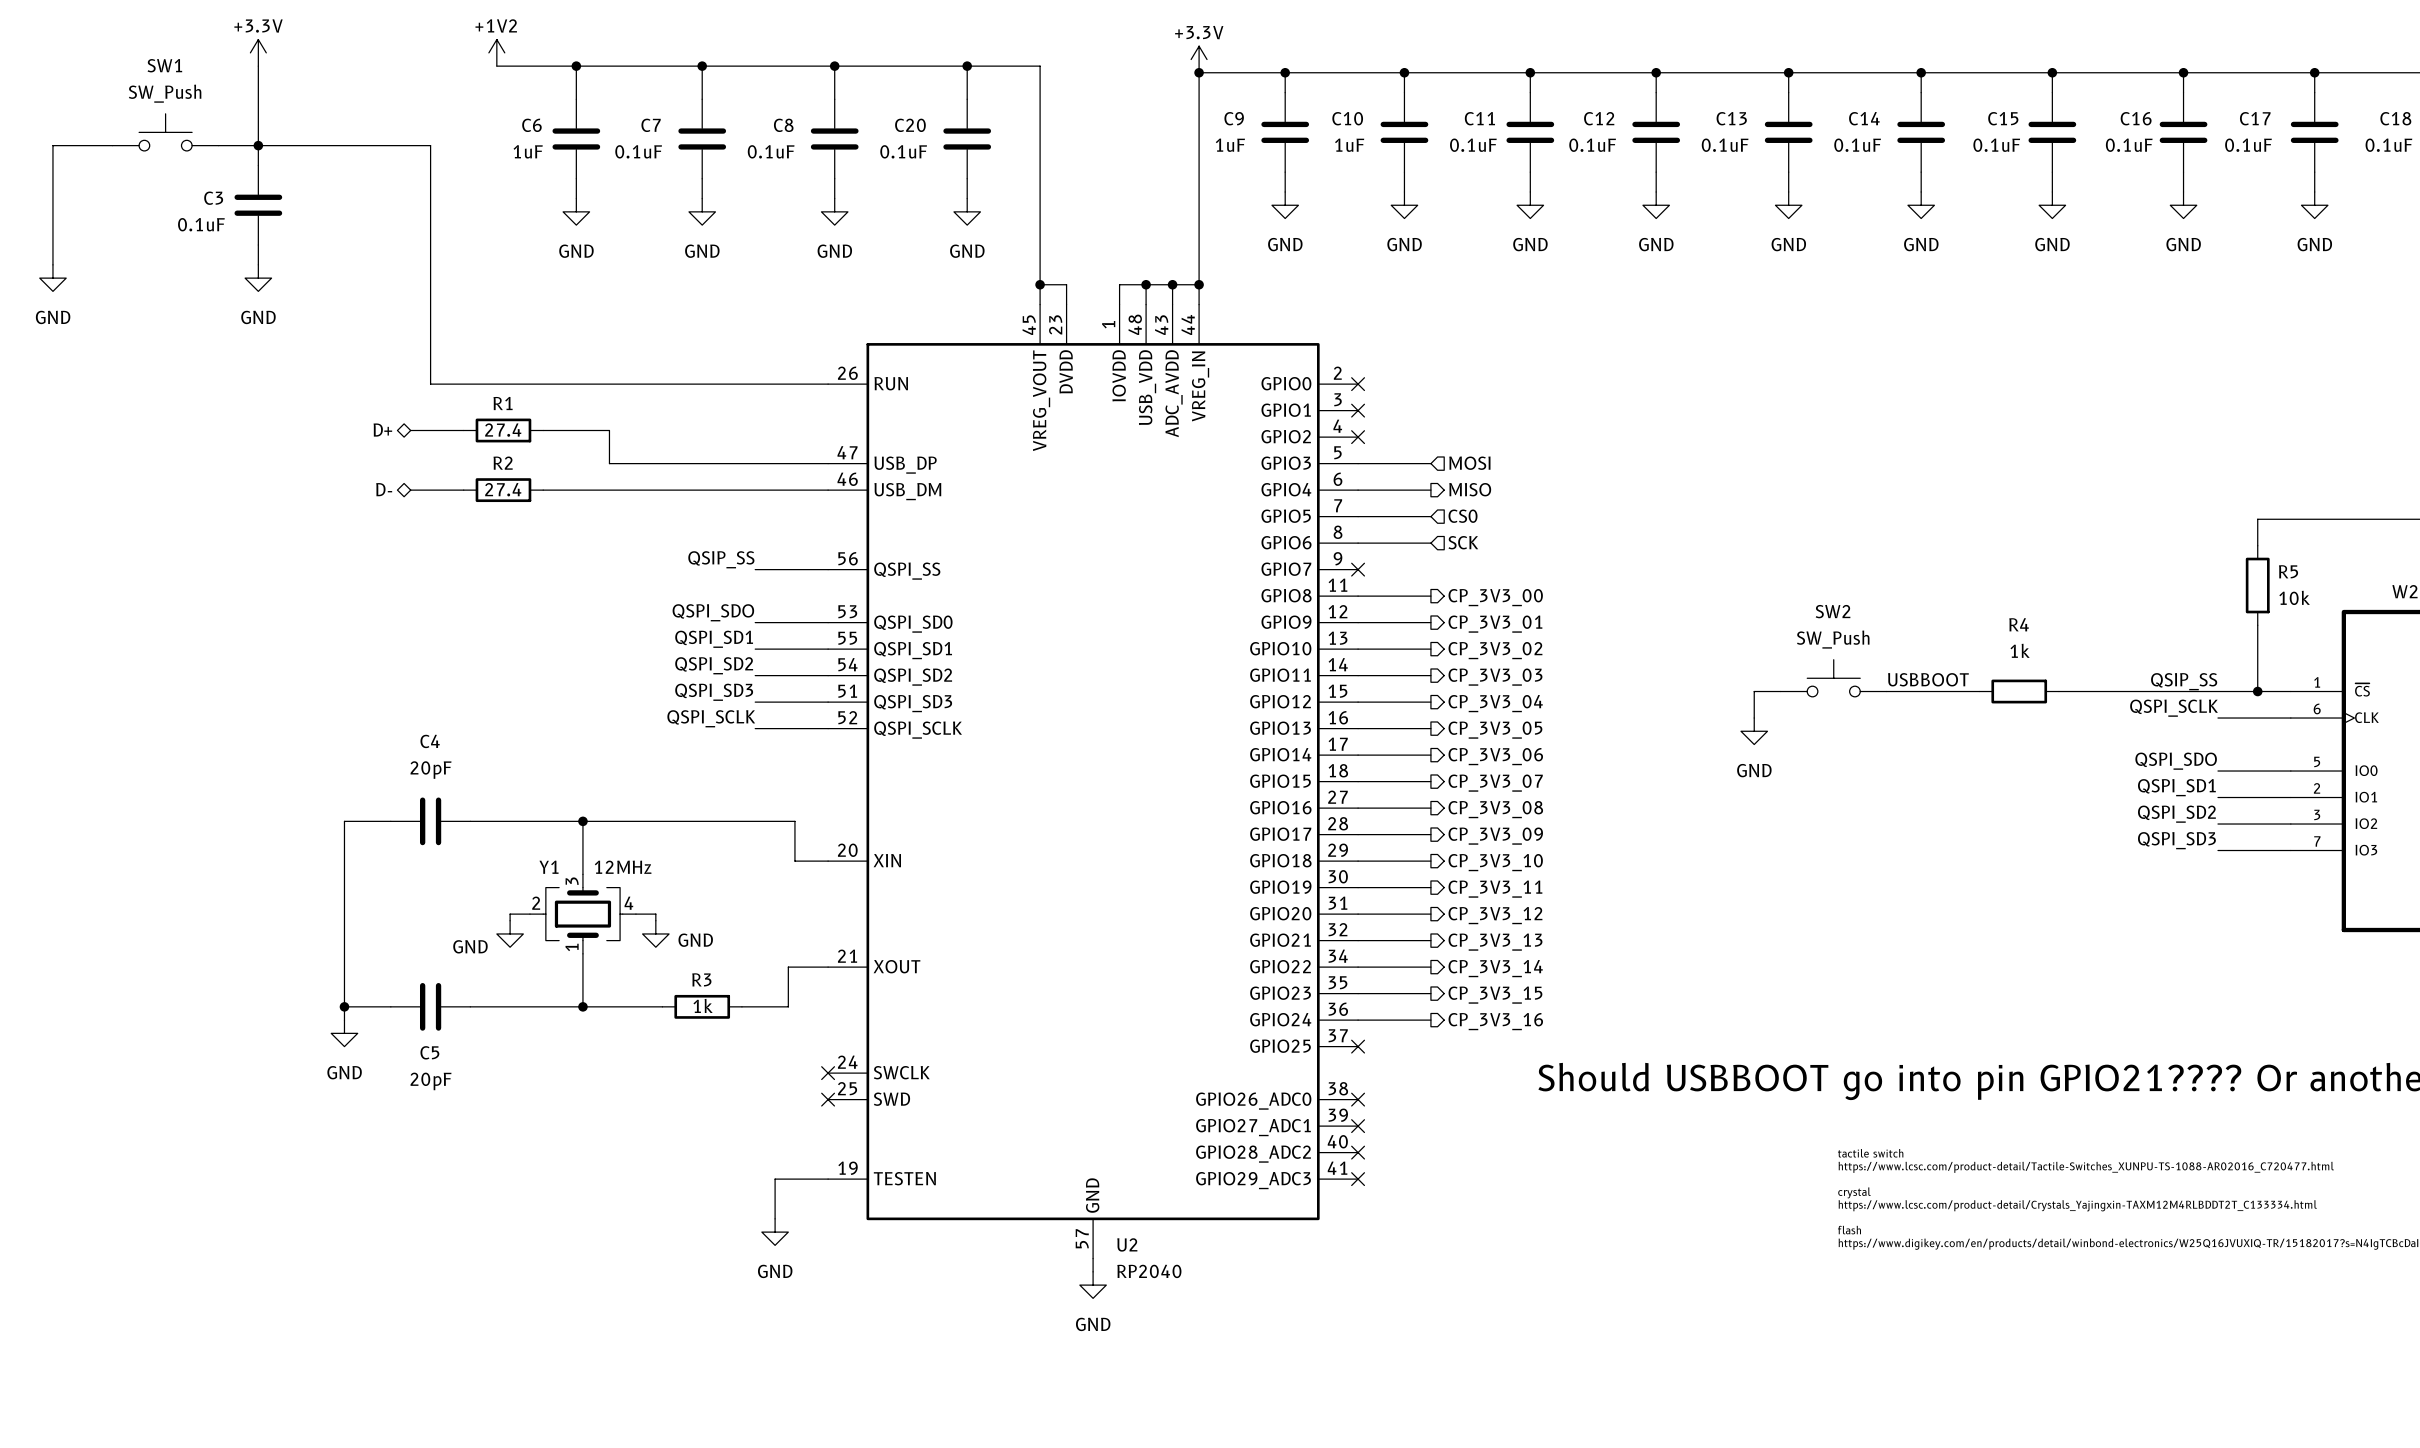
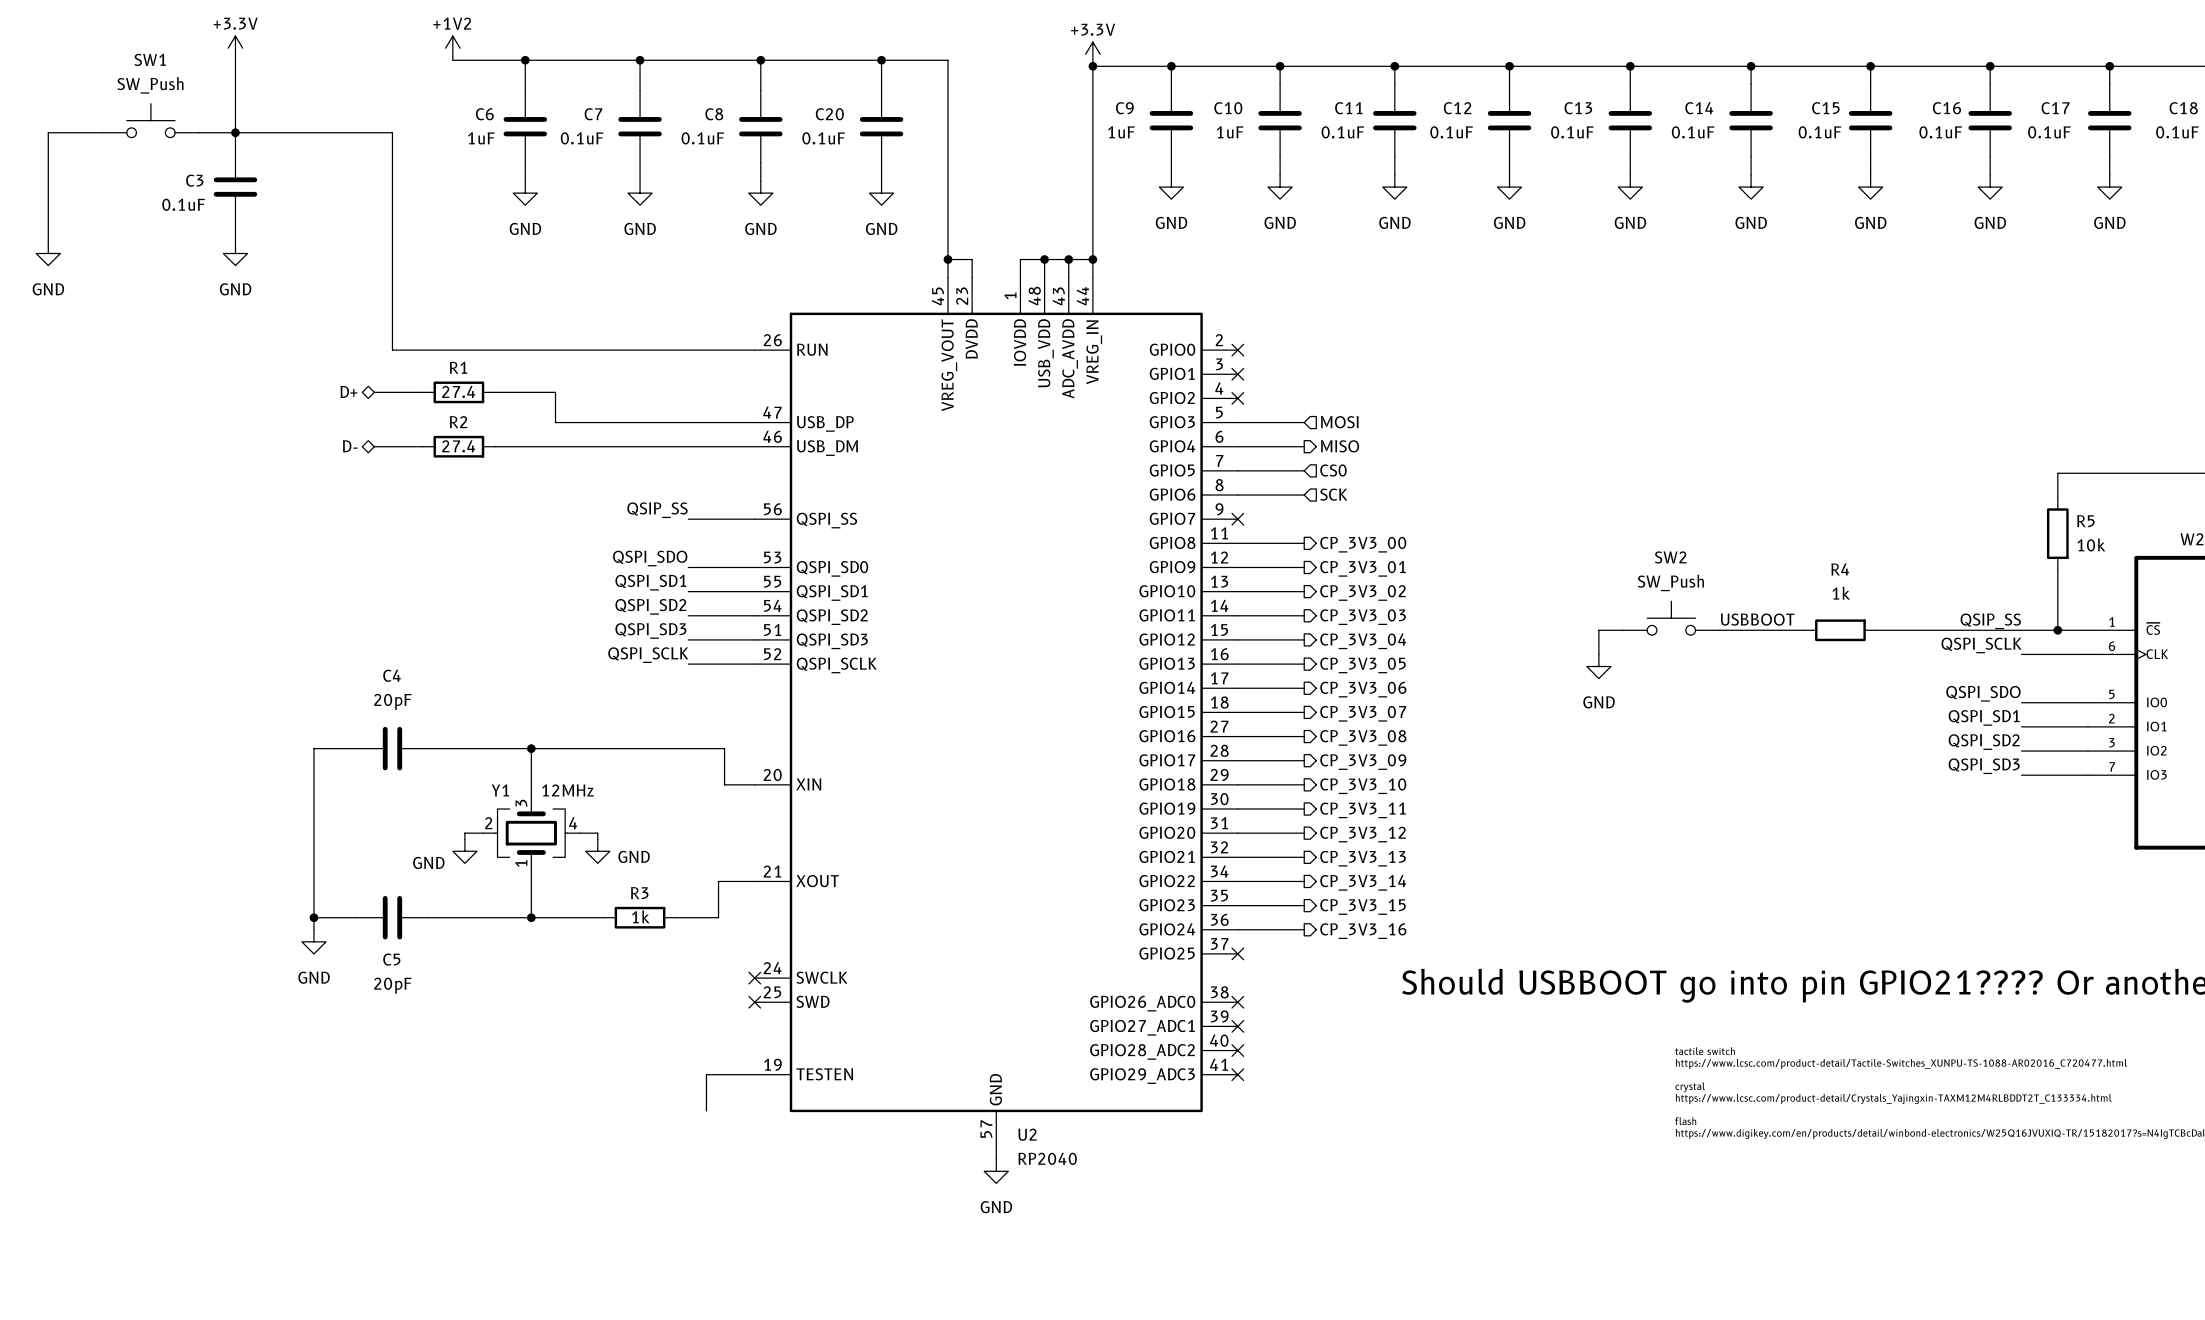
power symbol: GND (775, 1232) -> none

